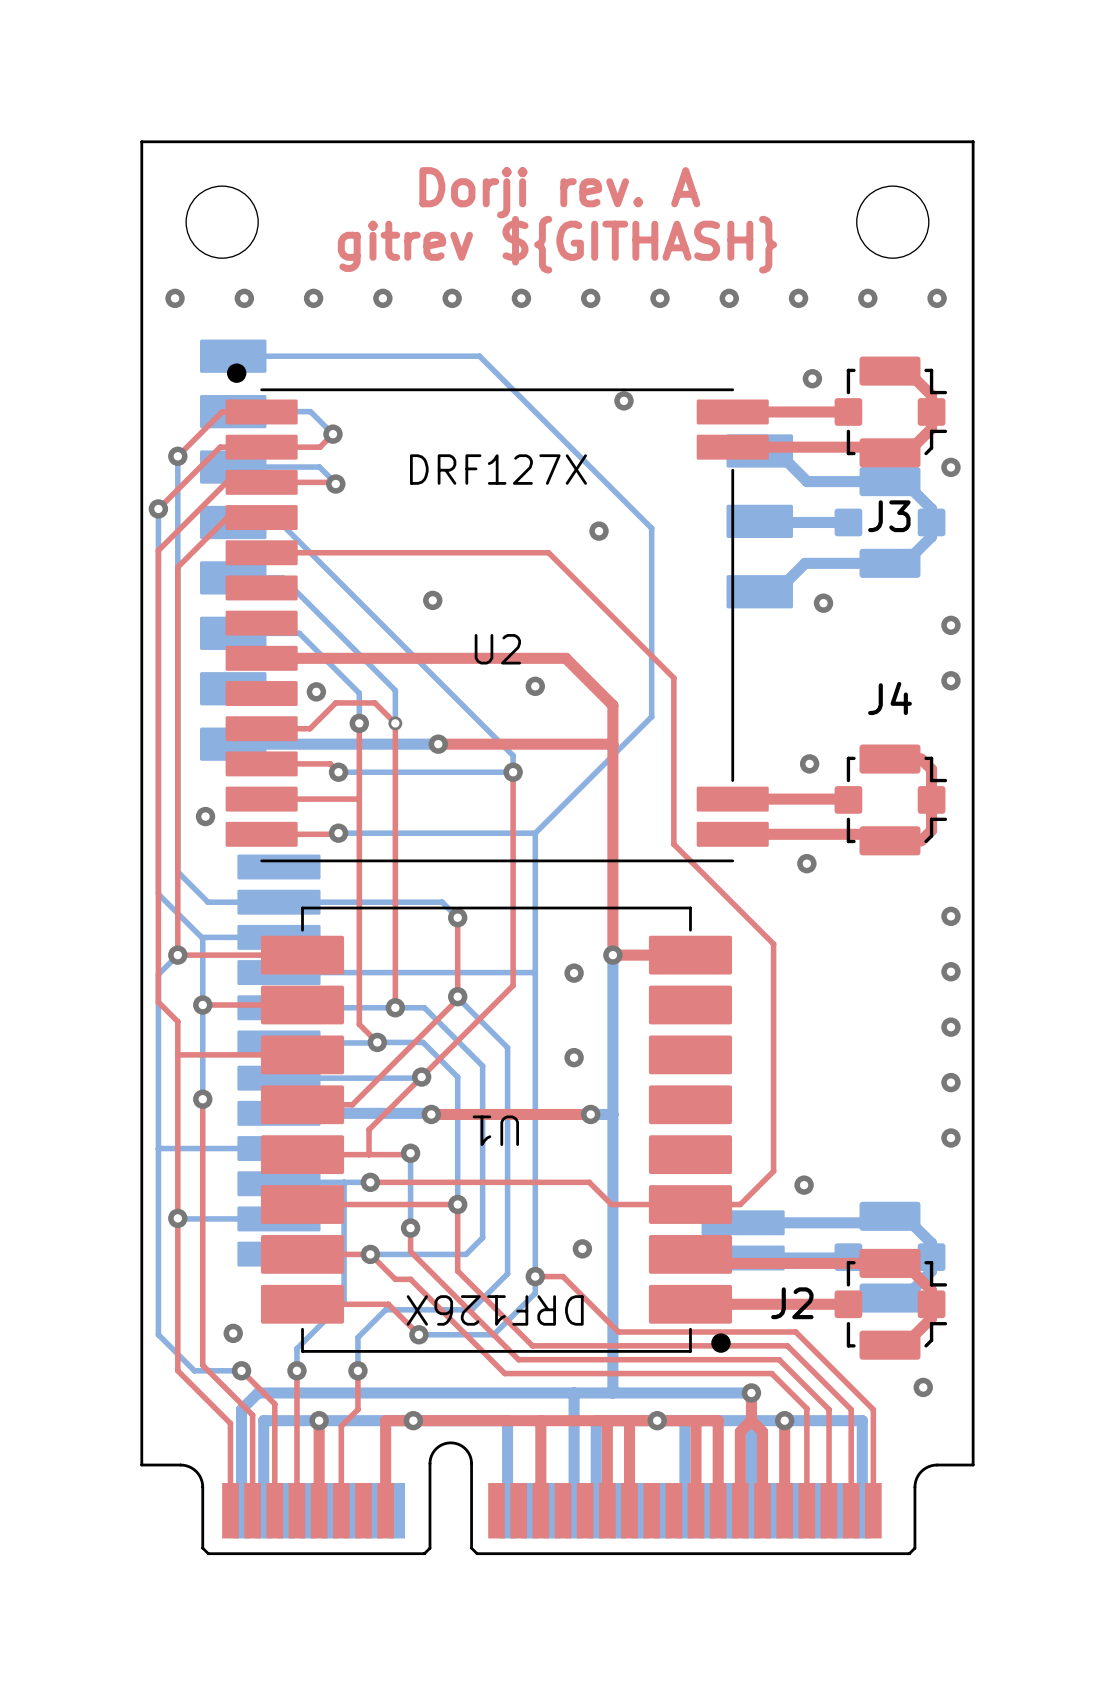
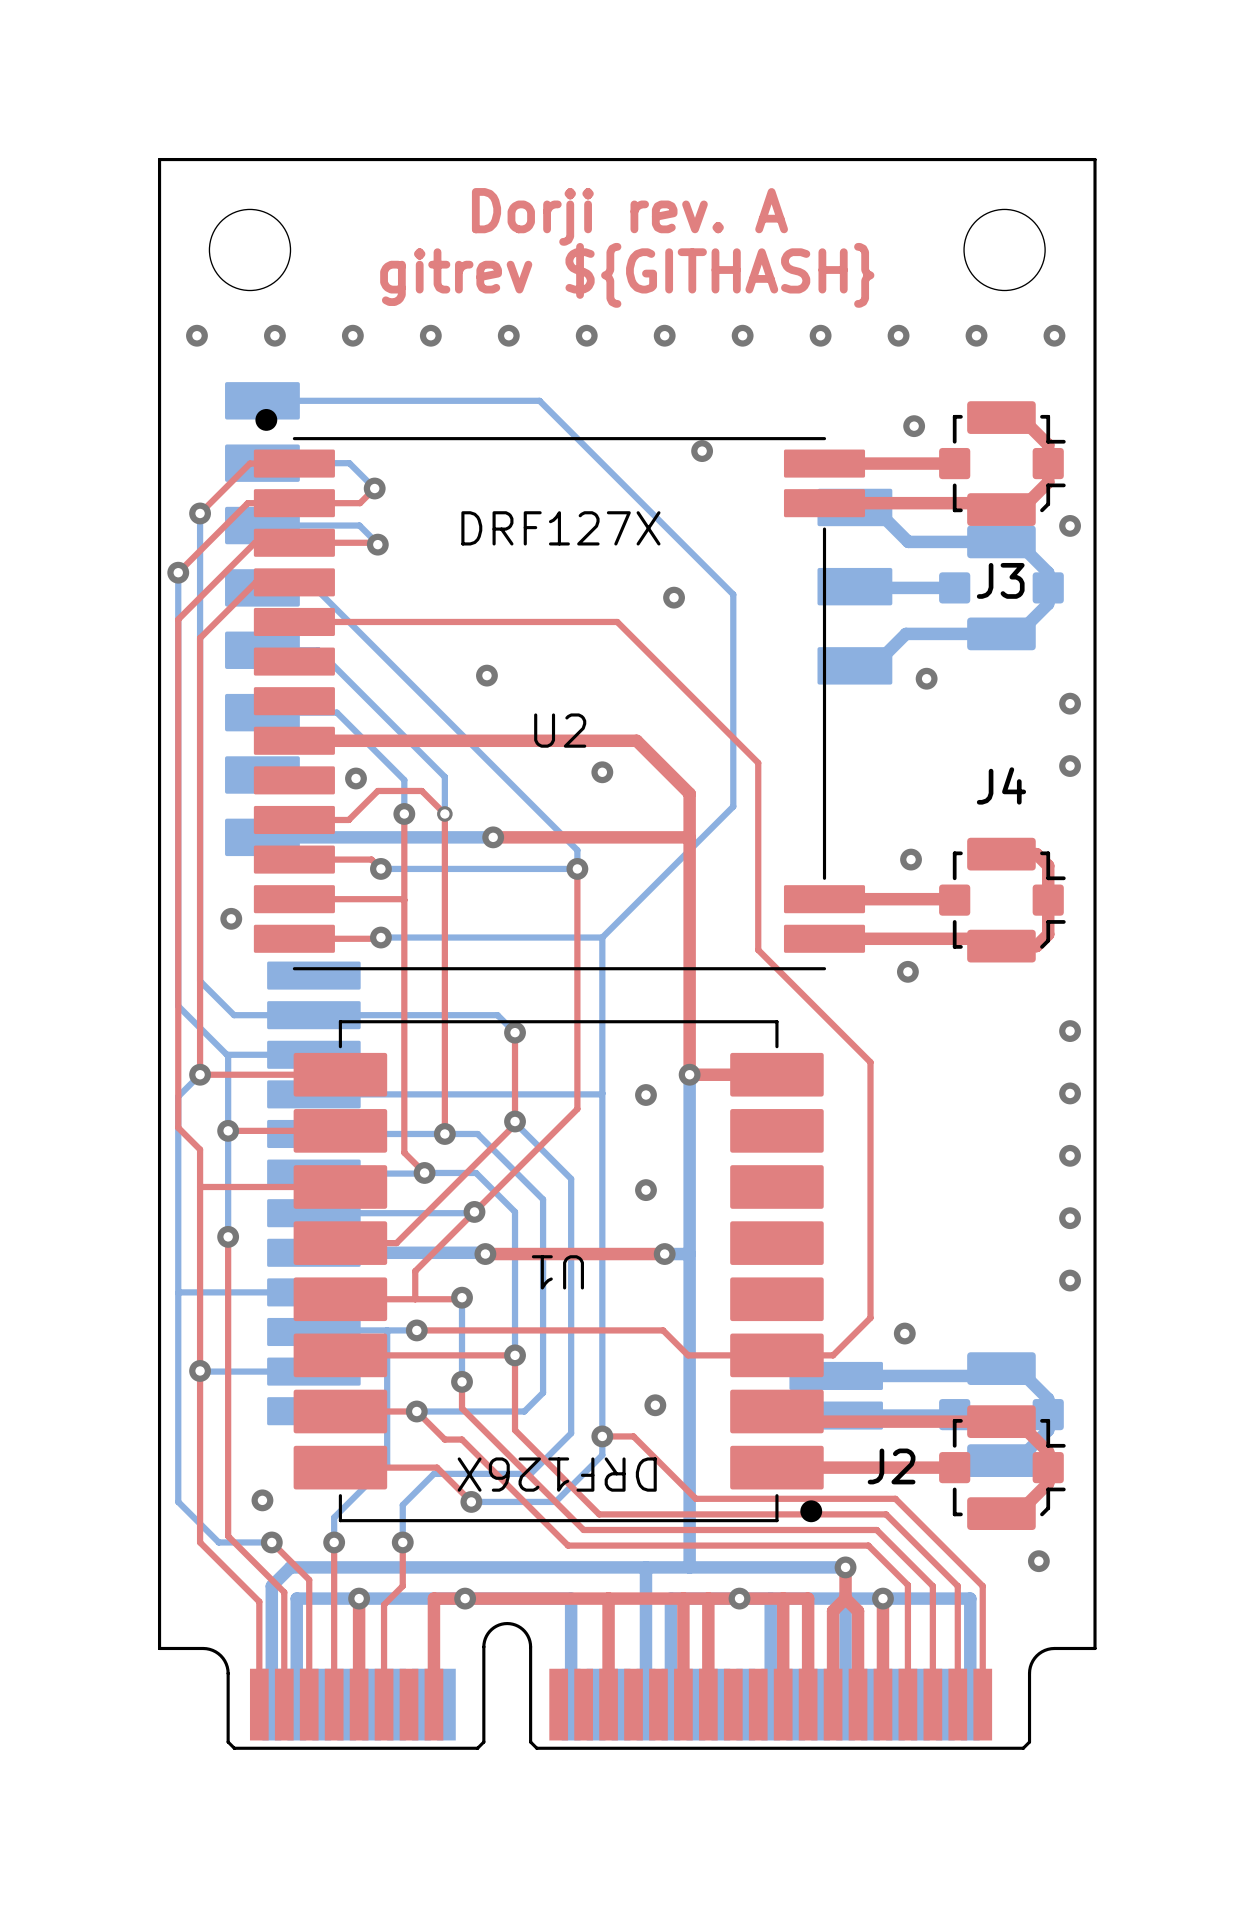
part footprint: [140, 140, 975, 1556] -> [157, 157, 1097, 1750]

